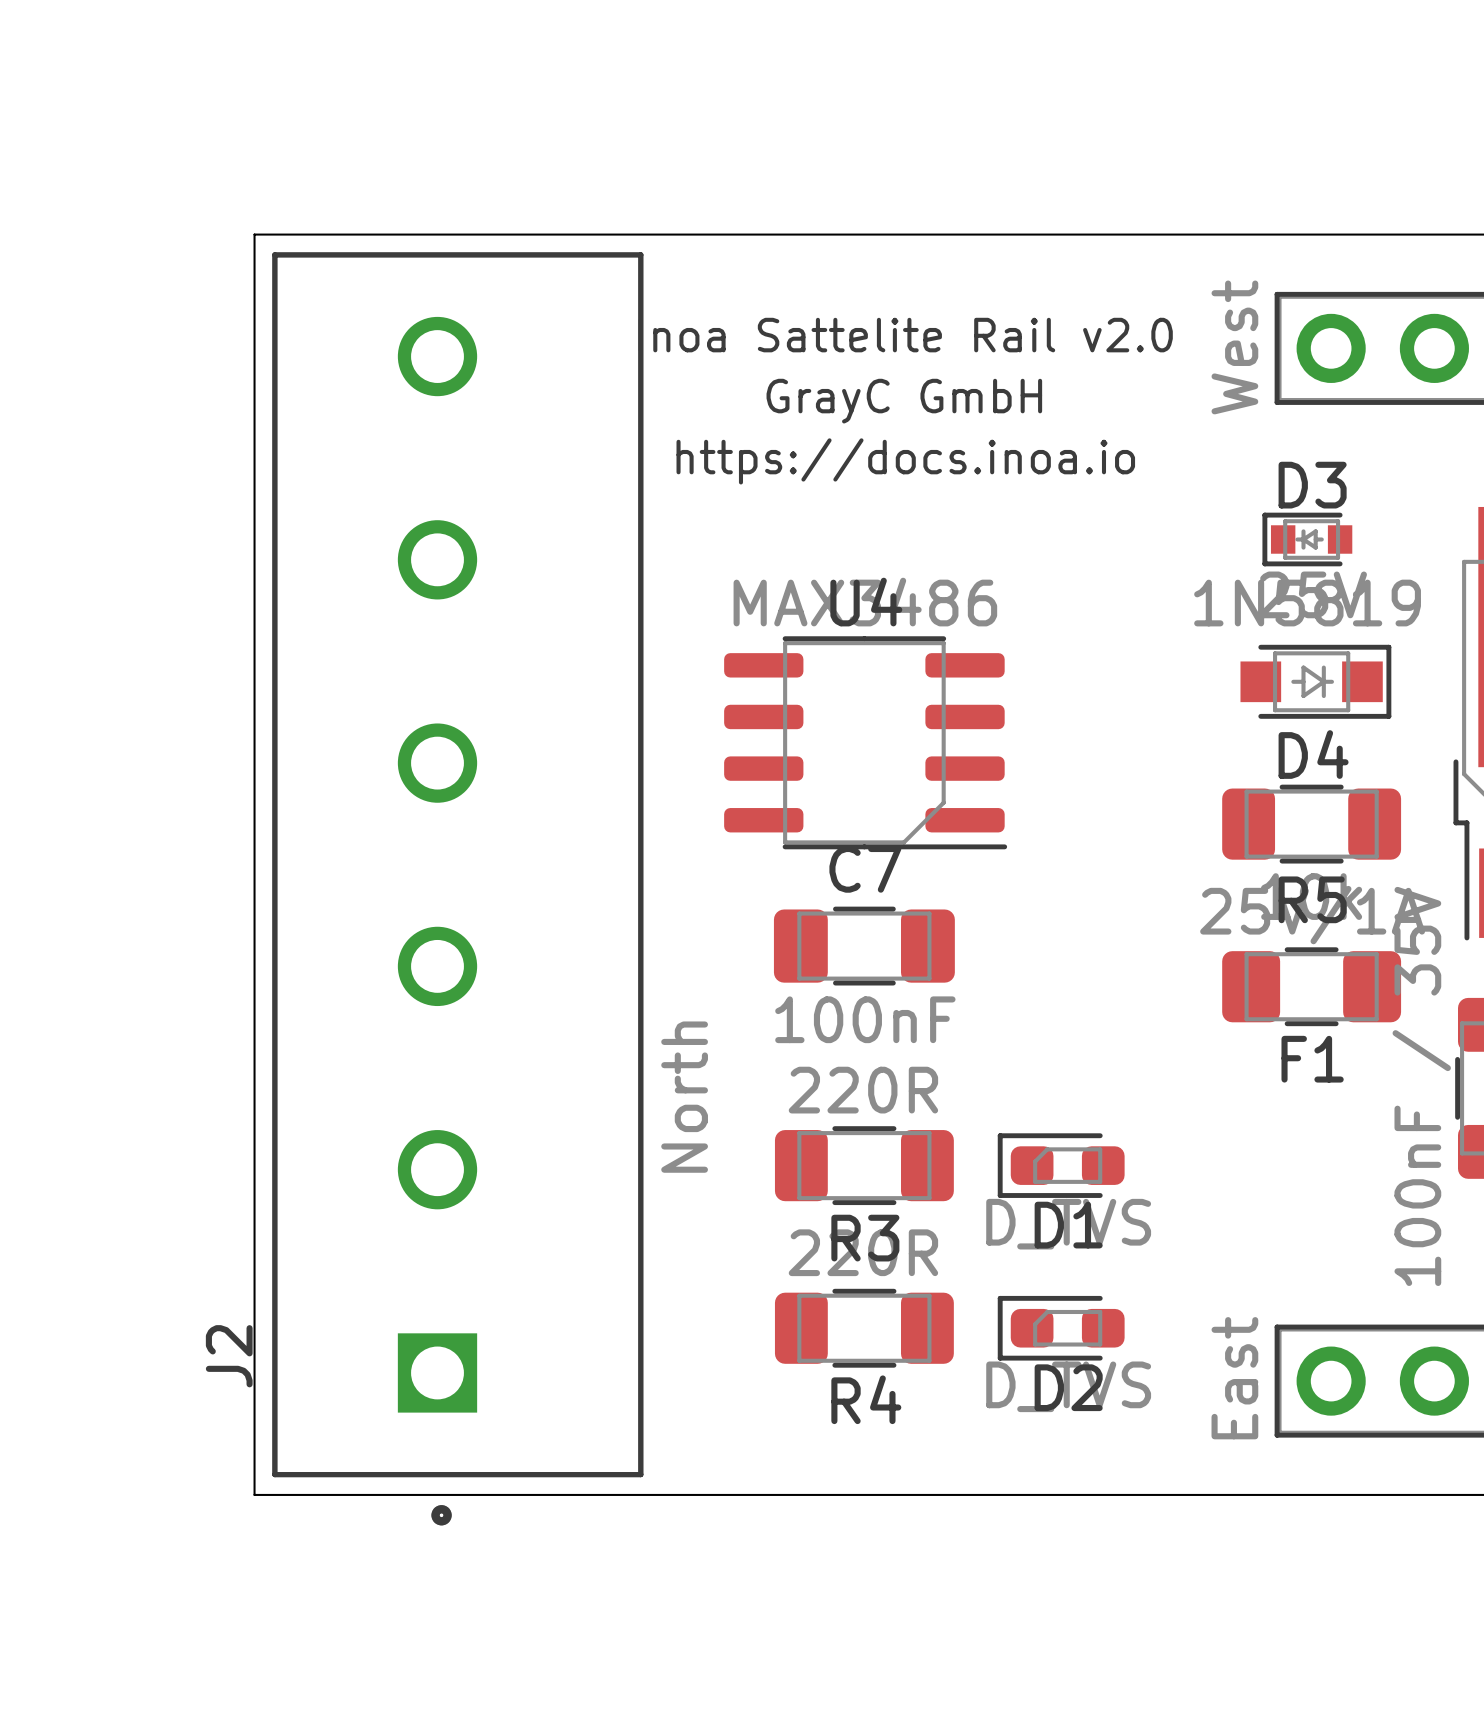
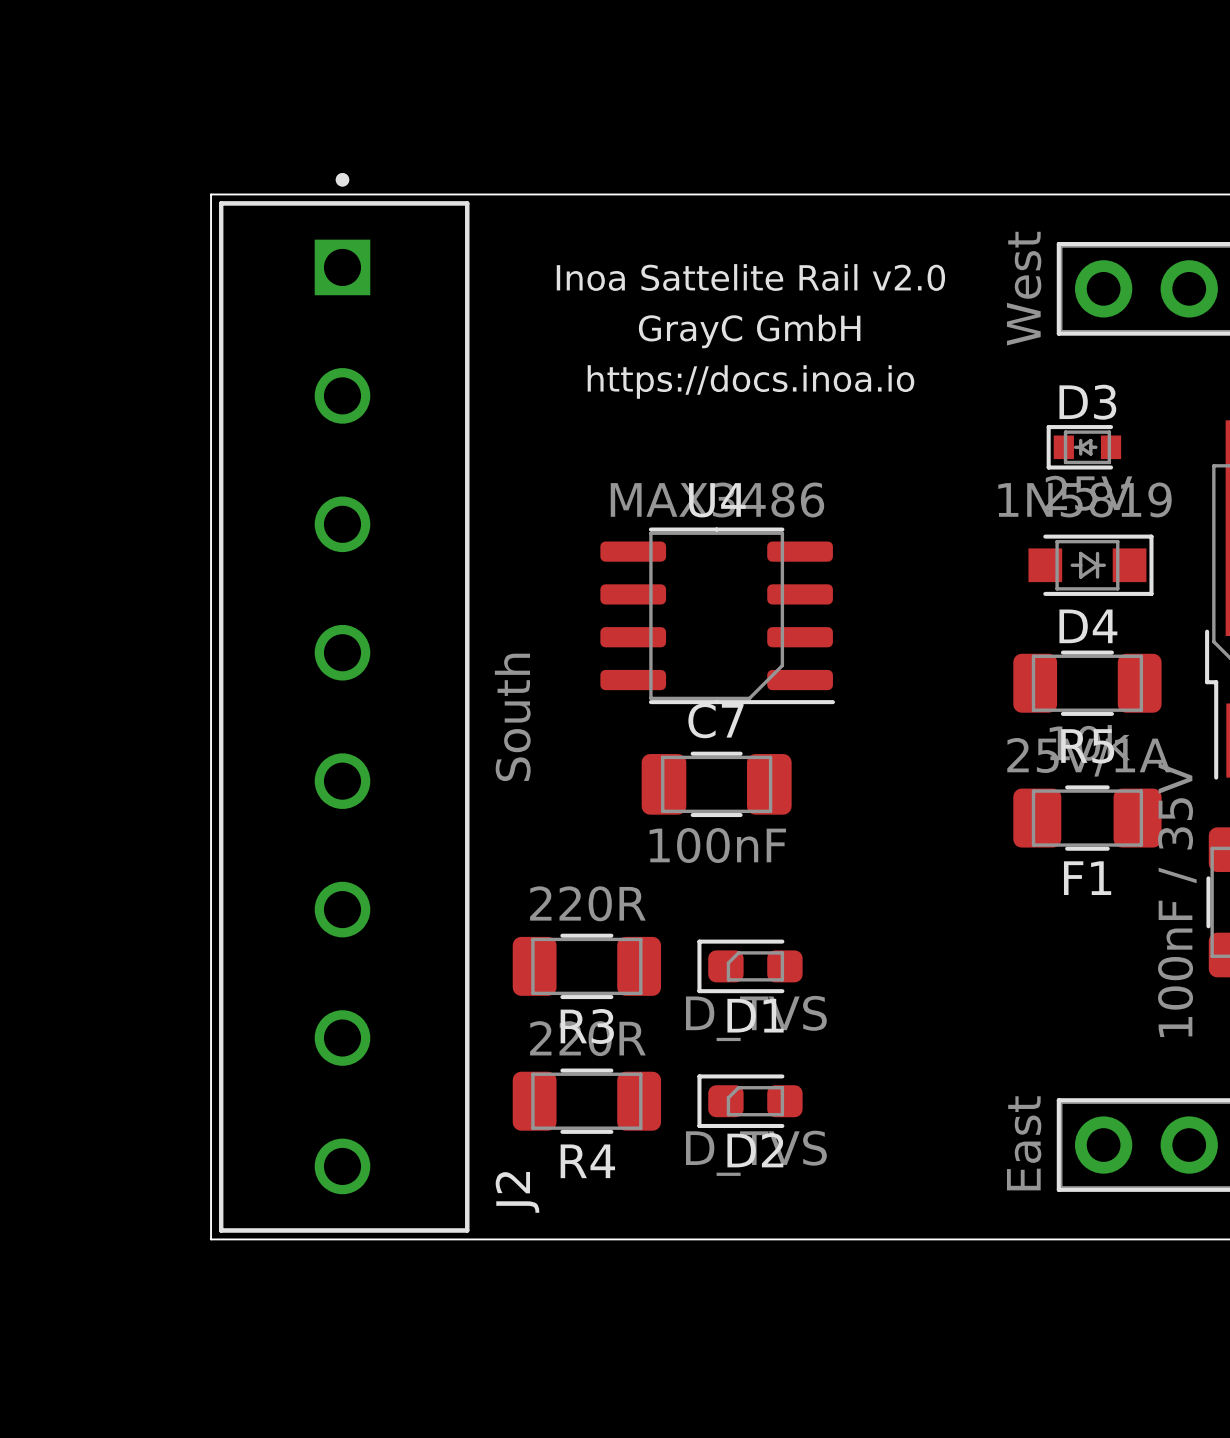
J2 footprint: [272, 252, 644, 1526] -> [219, 173, 470, 1233]
J2 value: North (684, 1097) -> South (512, 717)
R3 position: (864, 1165) -> (586, 966)
D1 position: (1061, 1165) -> (750, 966)
R4 position: (864, 1328) -> (586, 1101)
D2 position: (1061, 1328) -> (750, 1101)
J2 name position: J2 (229, 1356) -> J2 (517, 1192)

